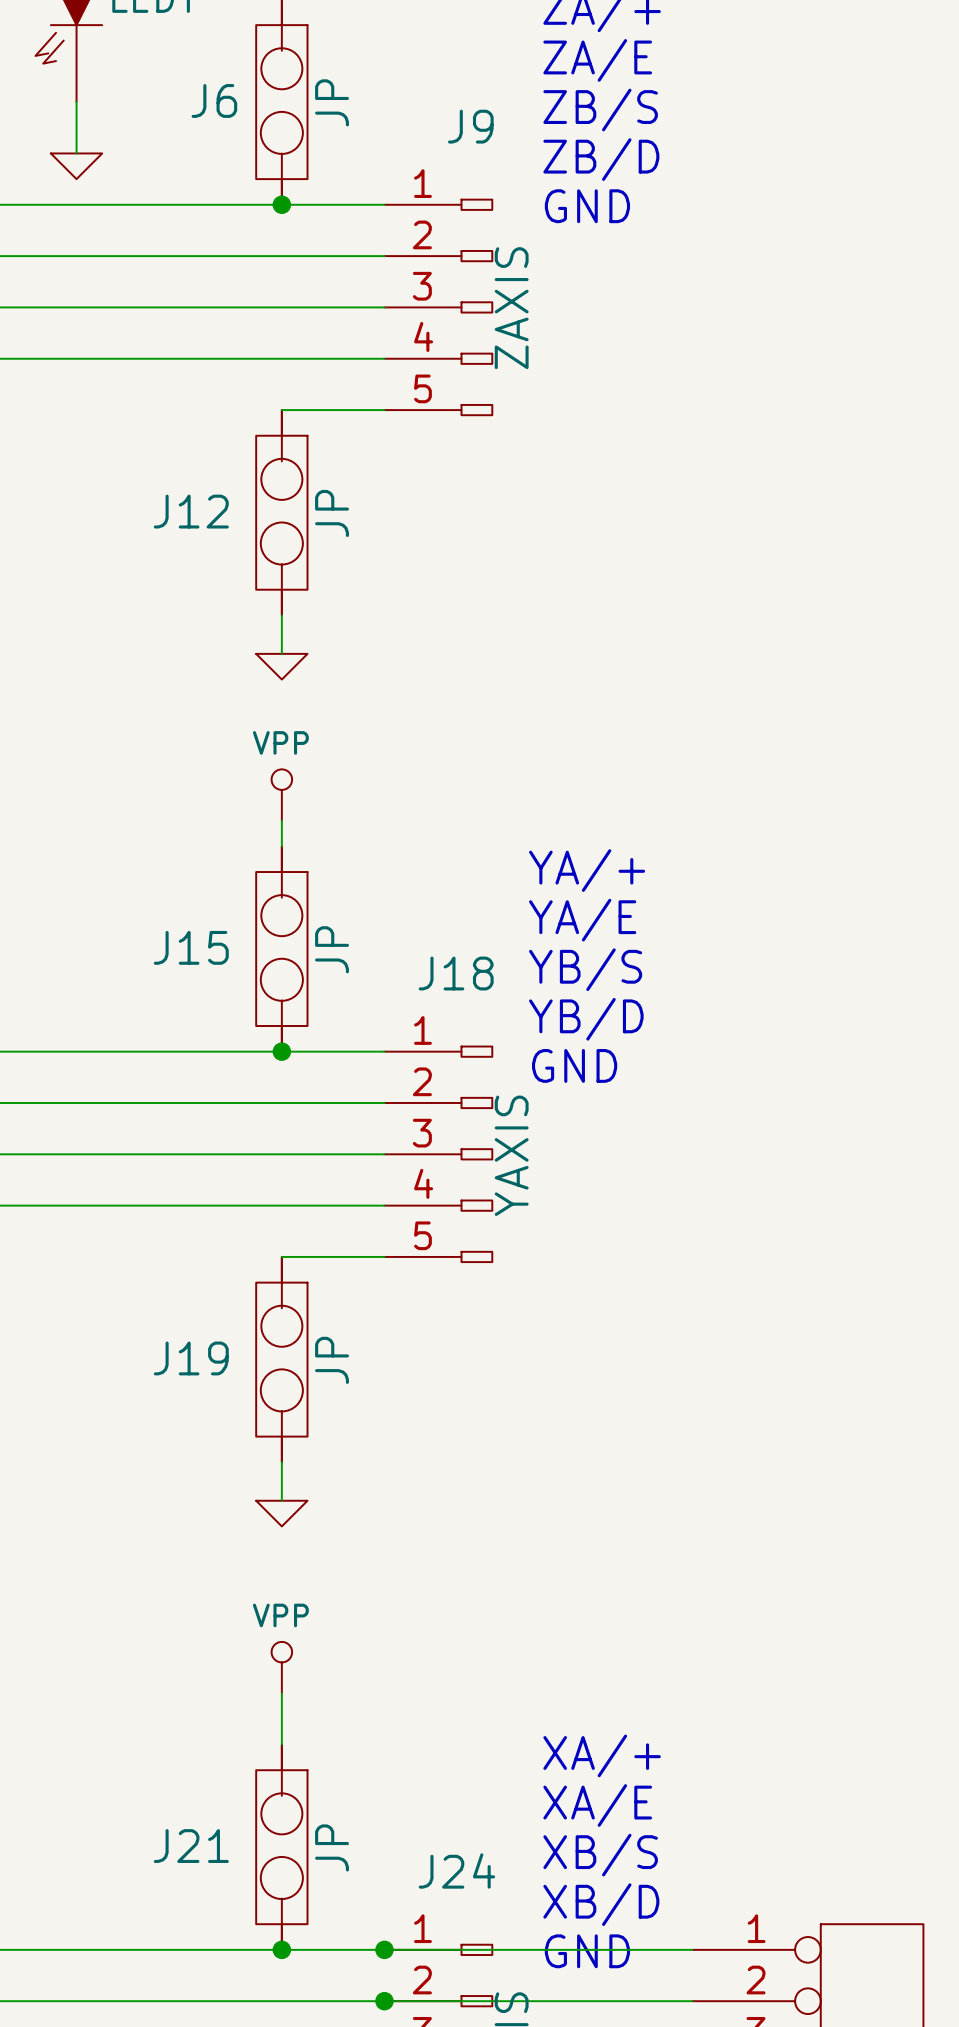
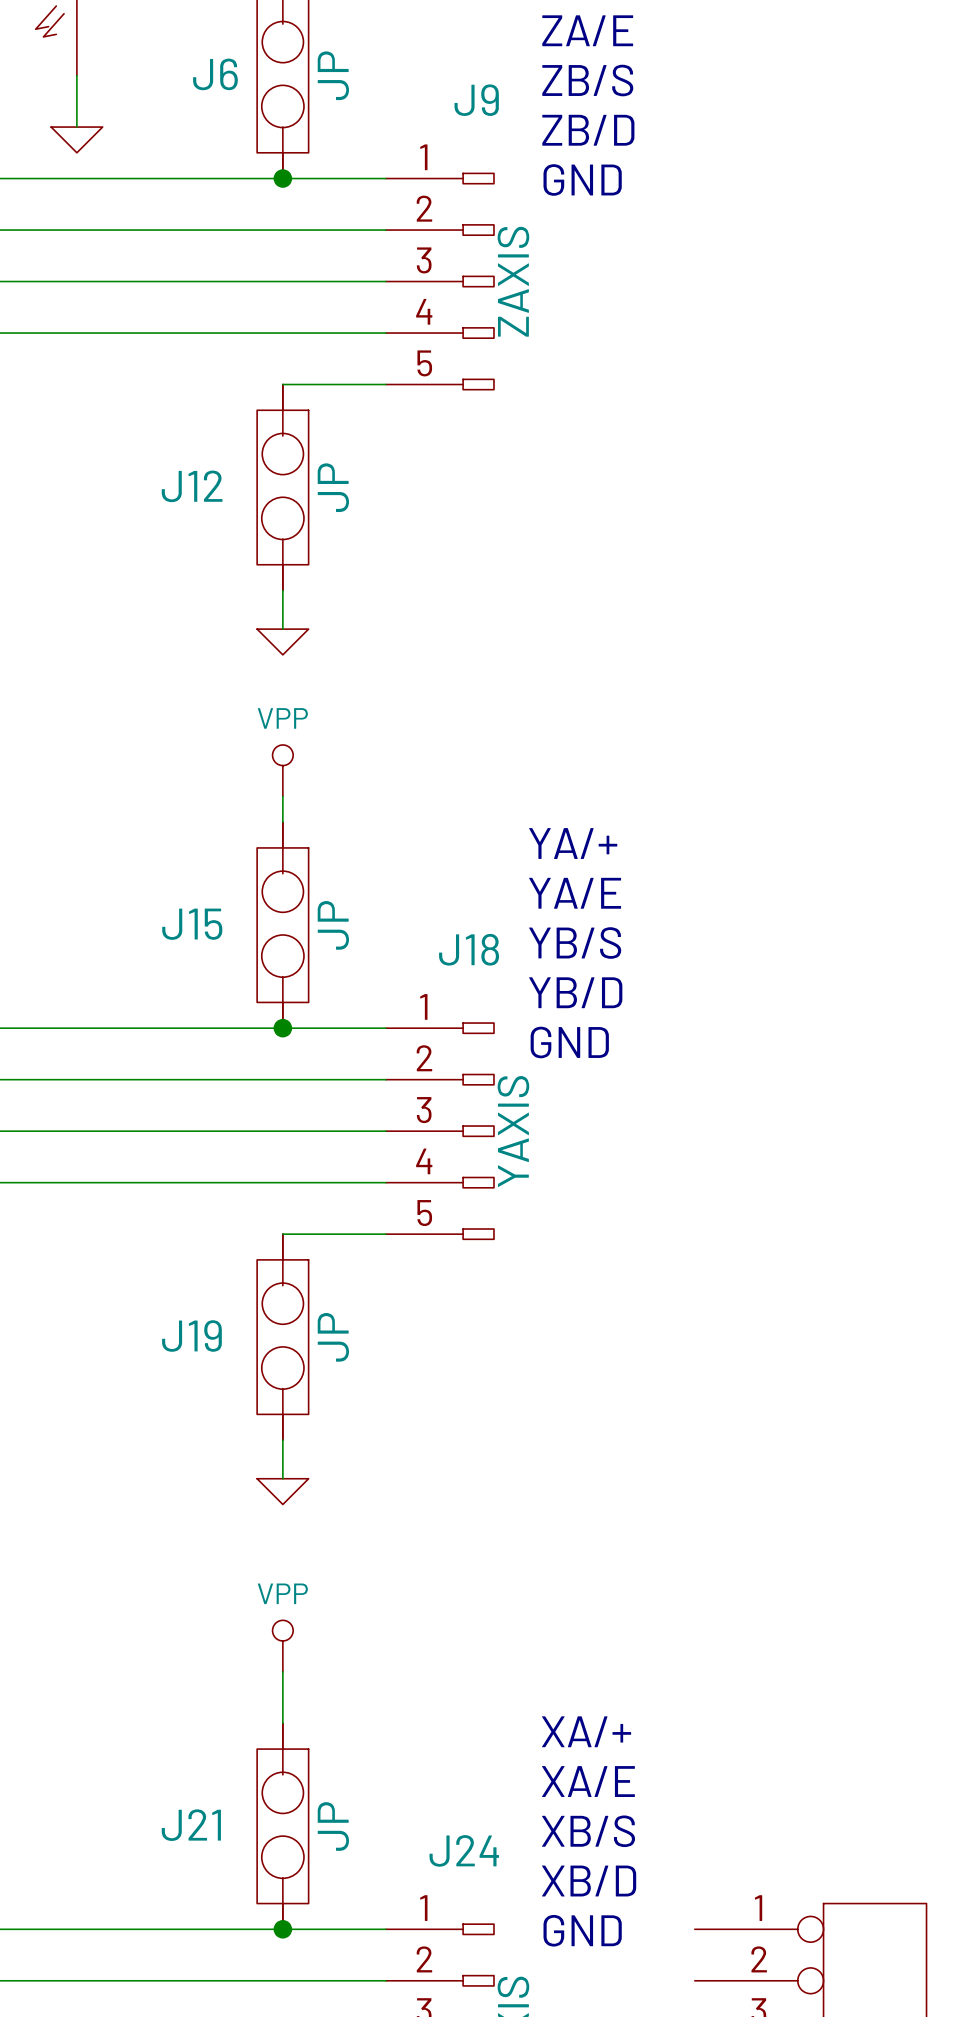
wire: (384, 1949) (692, 1949) -> none
junction: (384, 1949) -> none
wire: (384, 2001) (692, 2001) -> none
junction: (384, 2001) -> none

